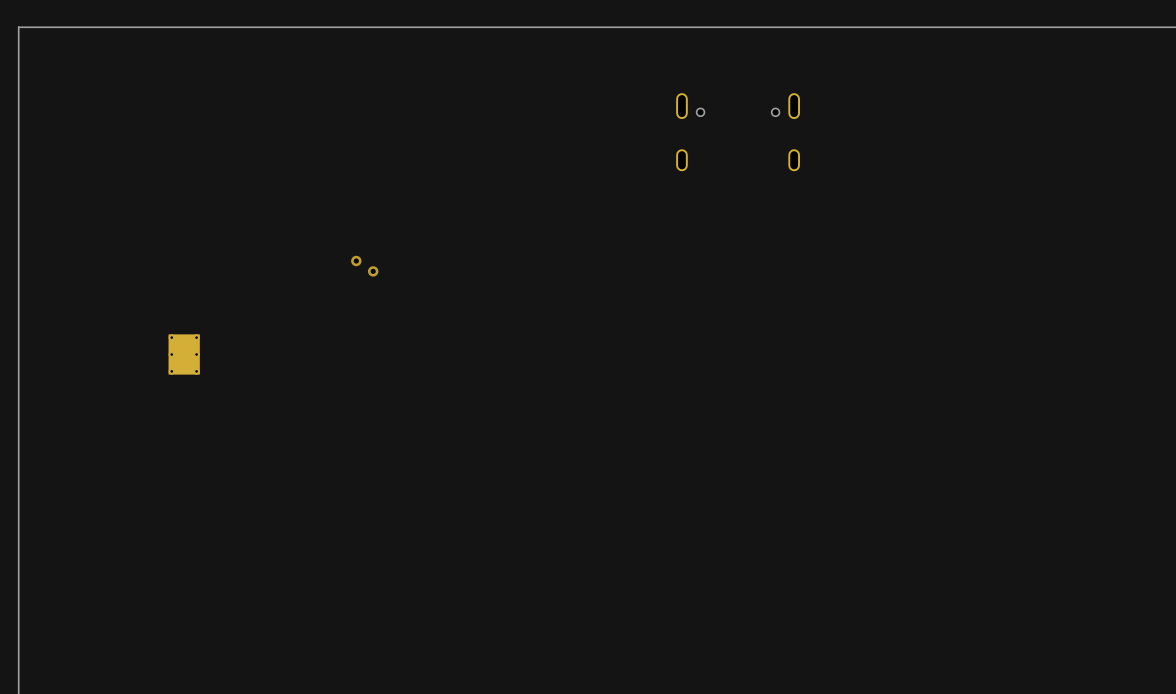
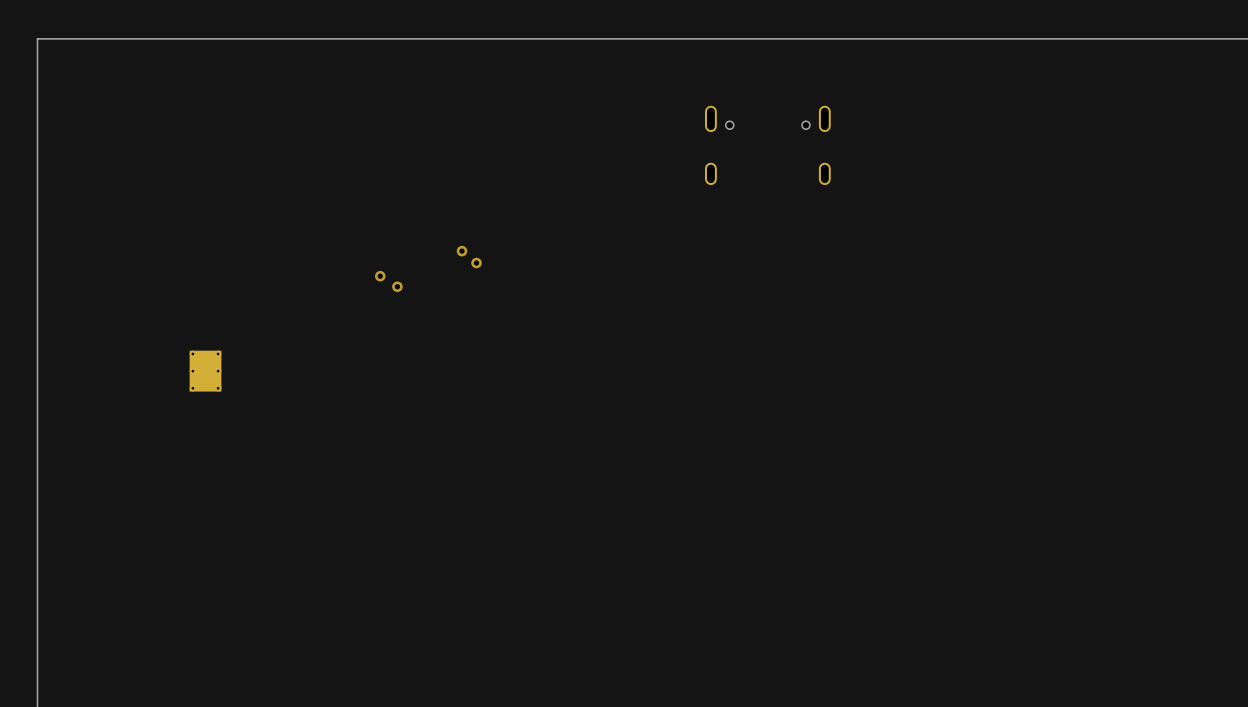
via: none -> (462, 251)
via: none -> (476, 263)

